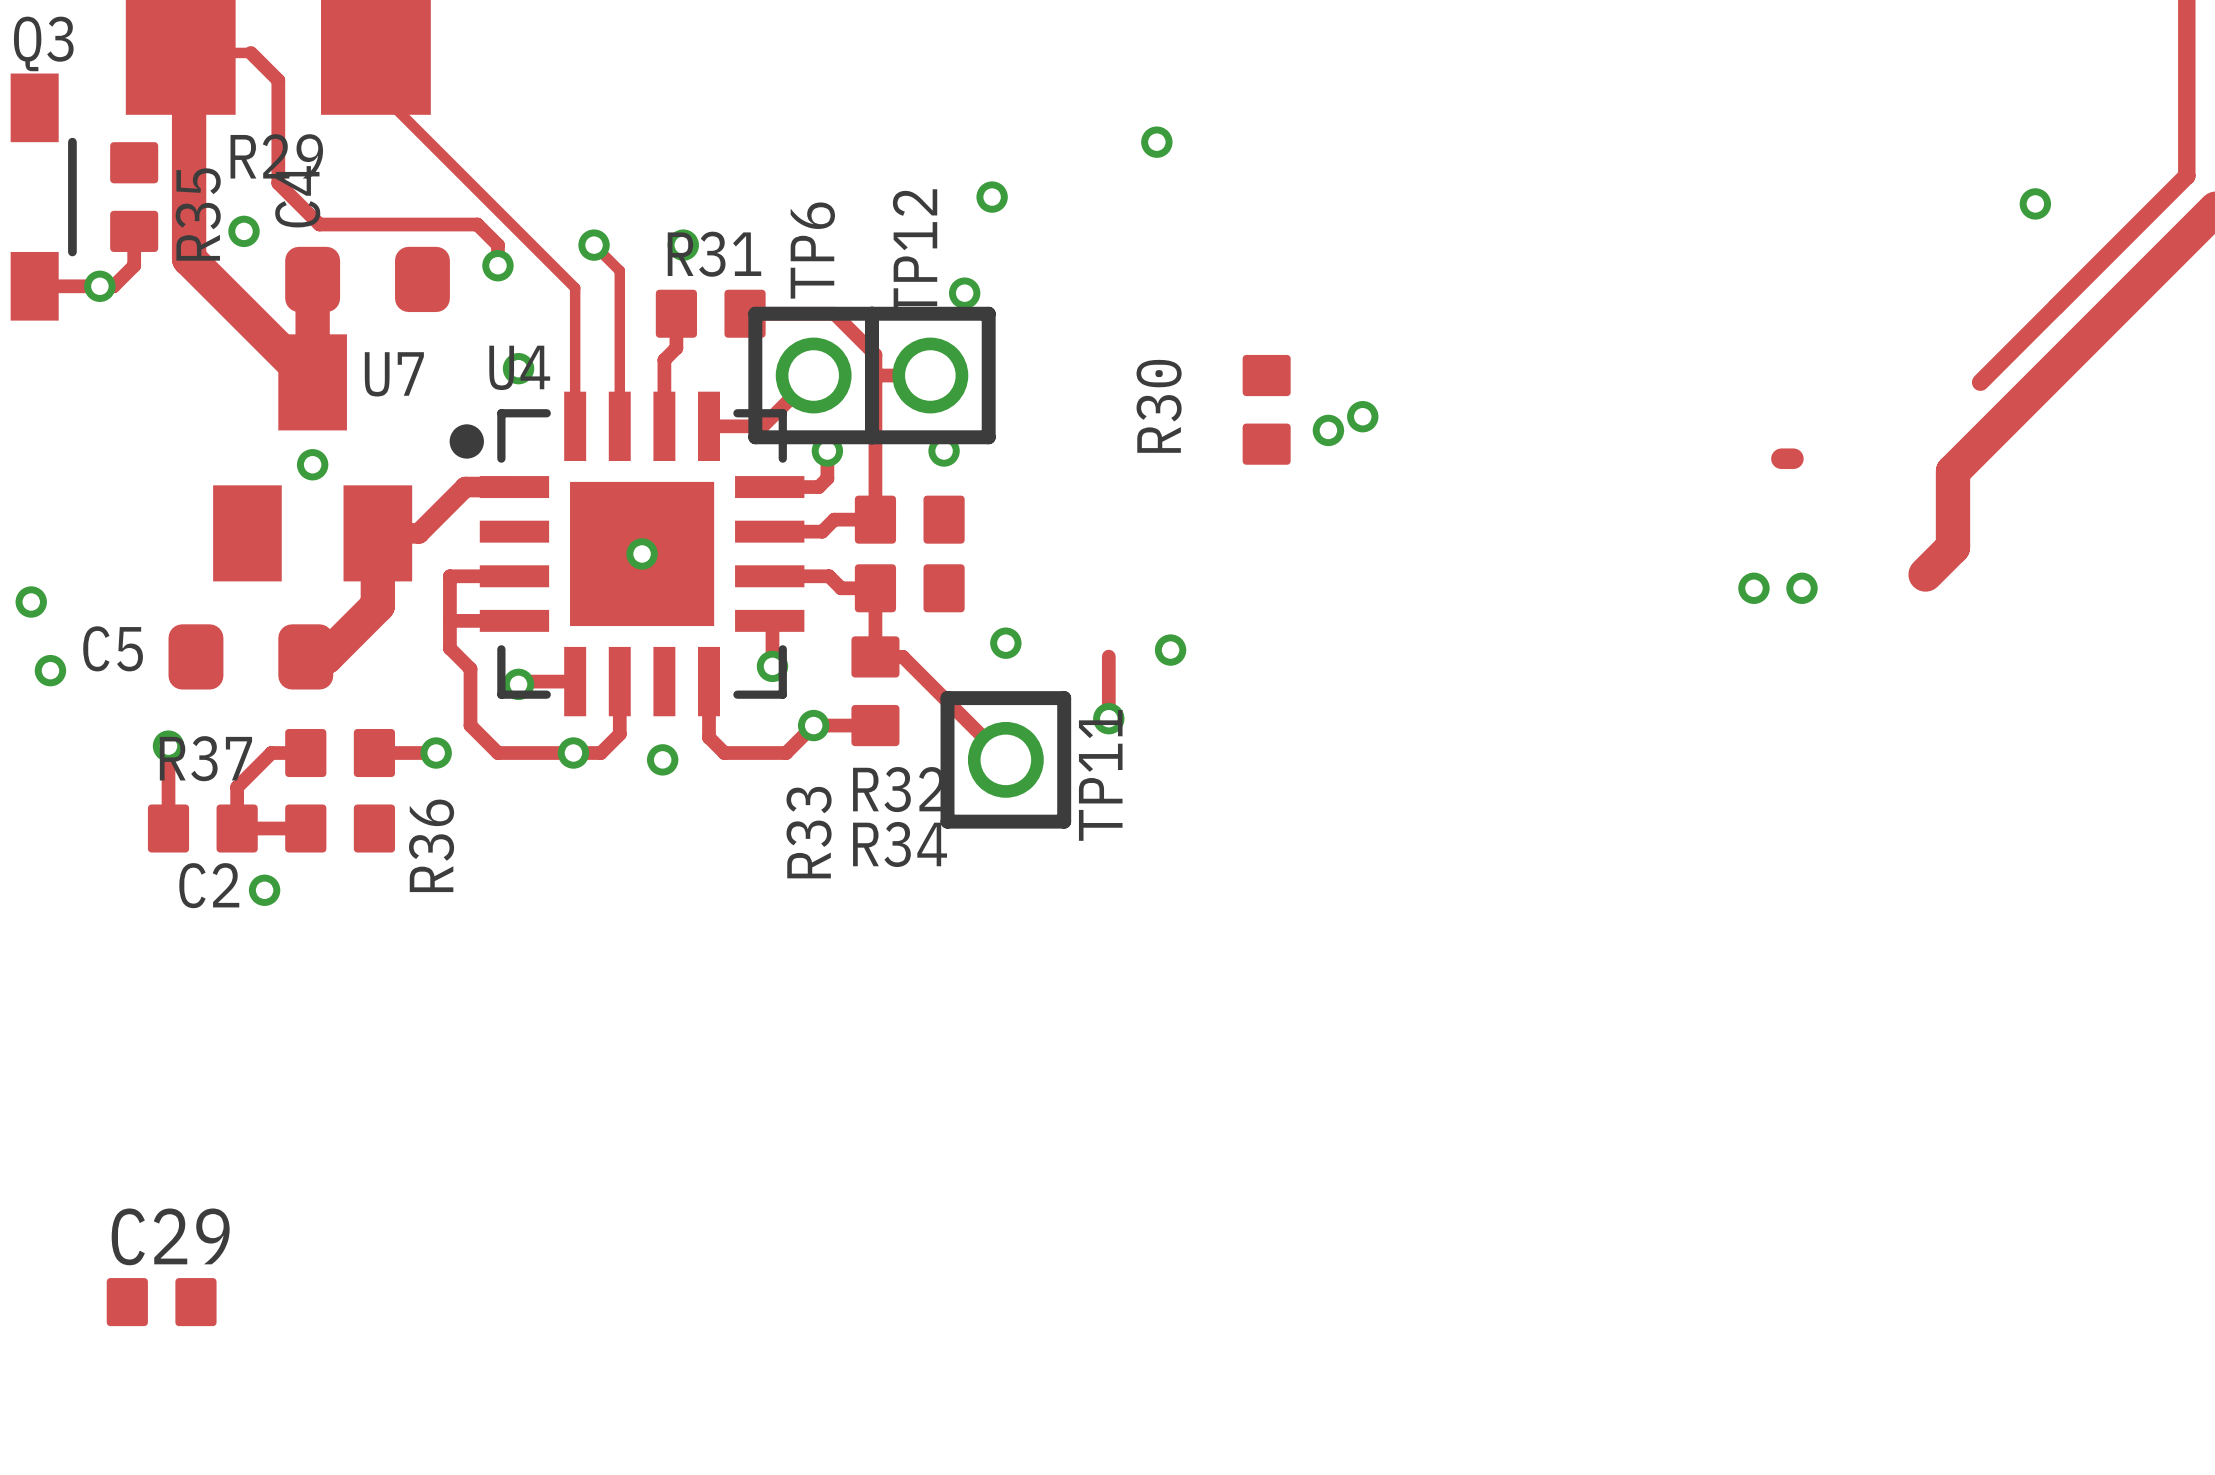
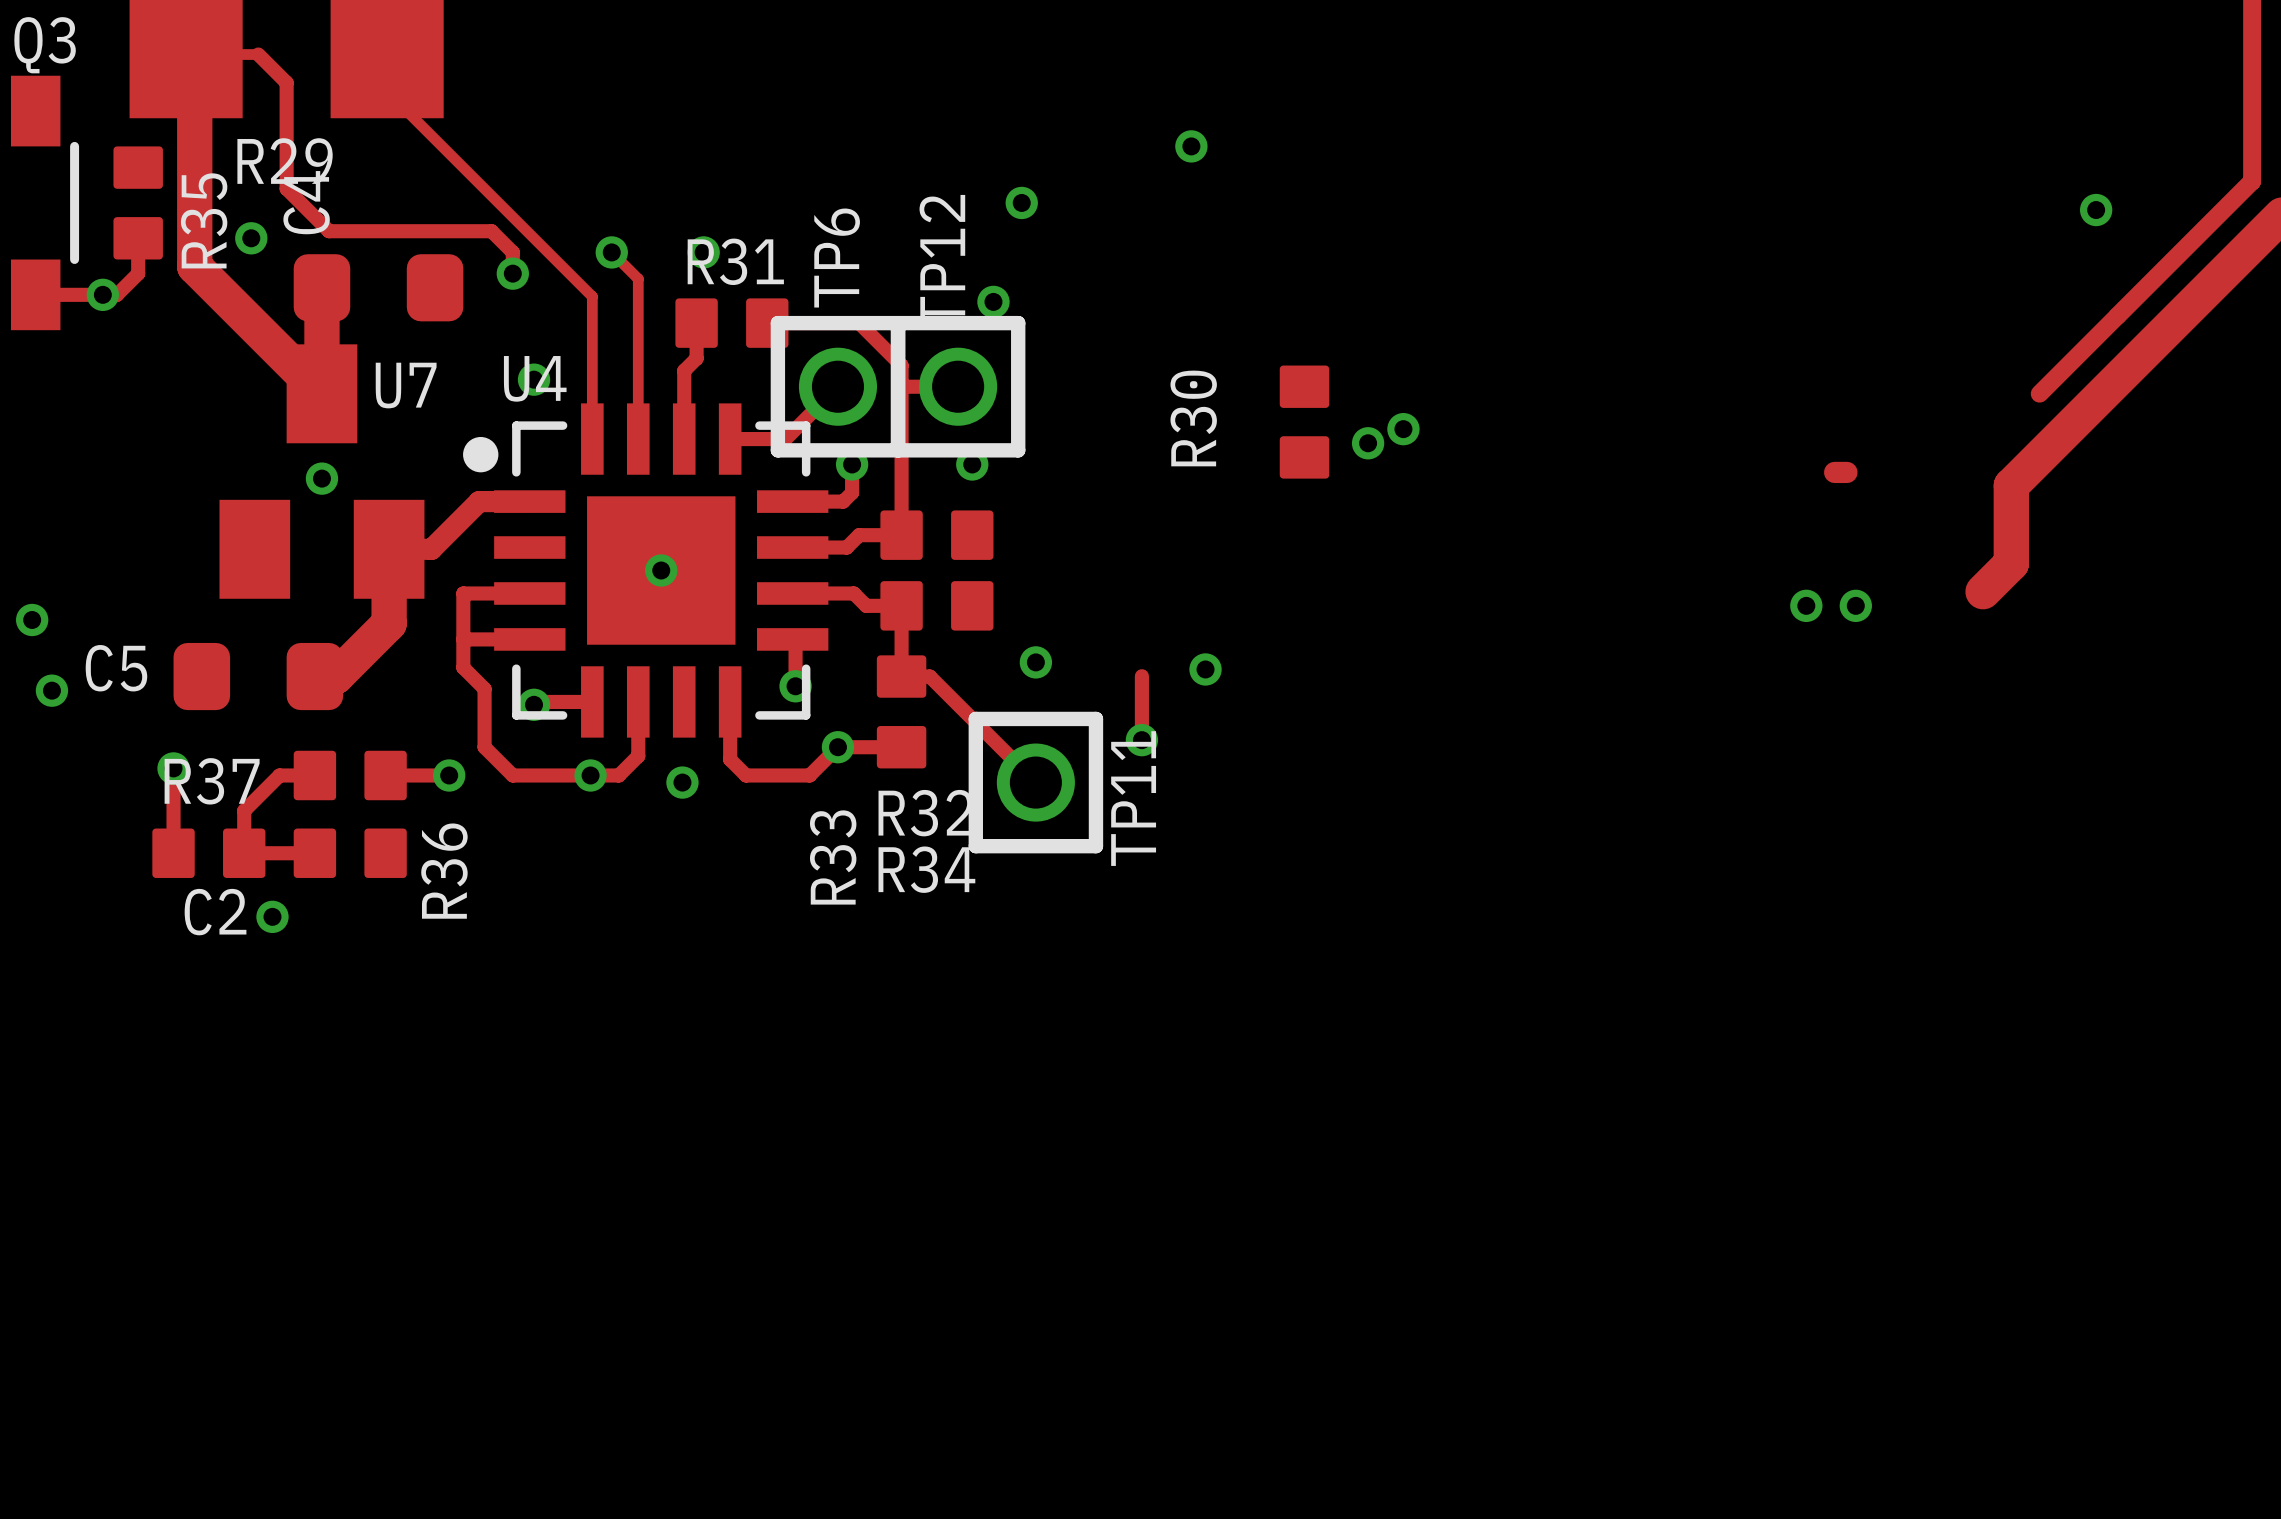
C29: (161, 1302) -> none

